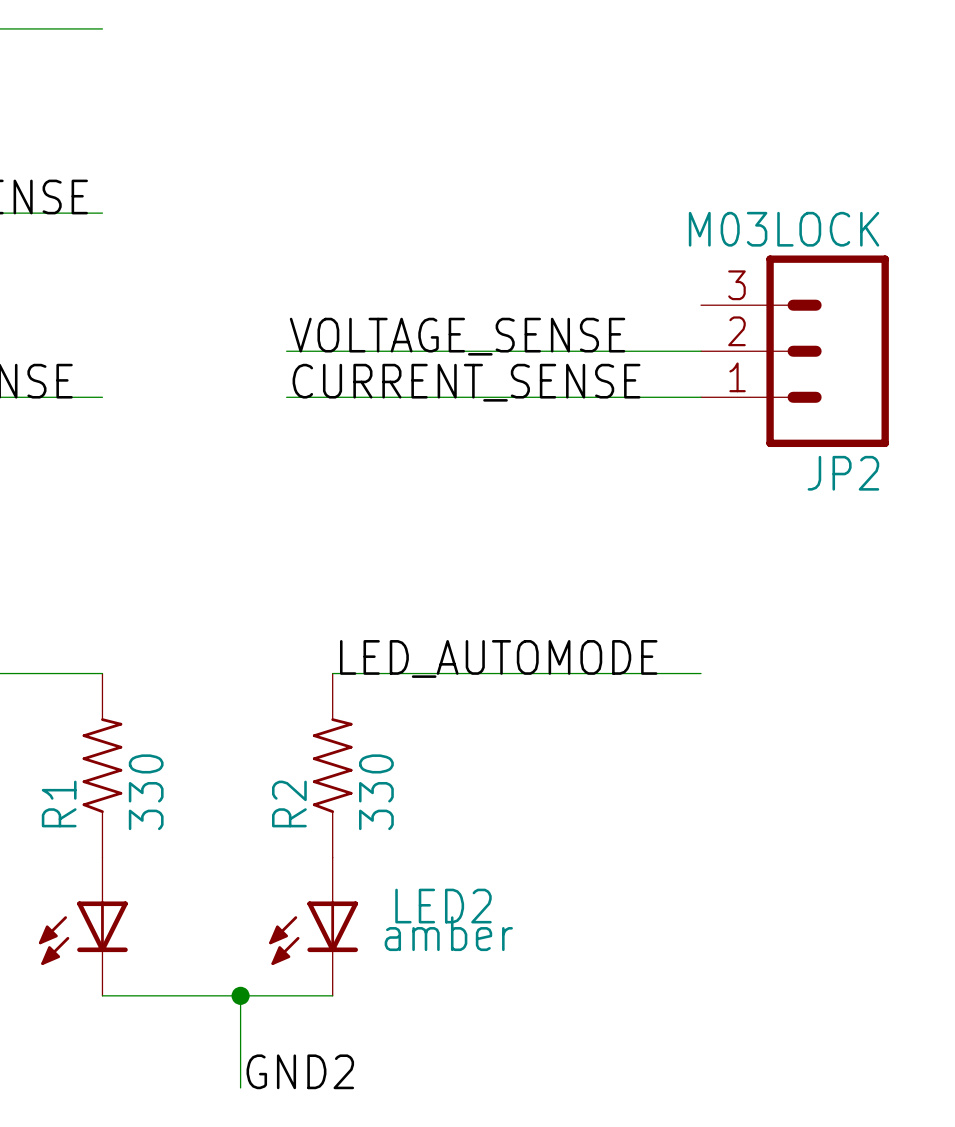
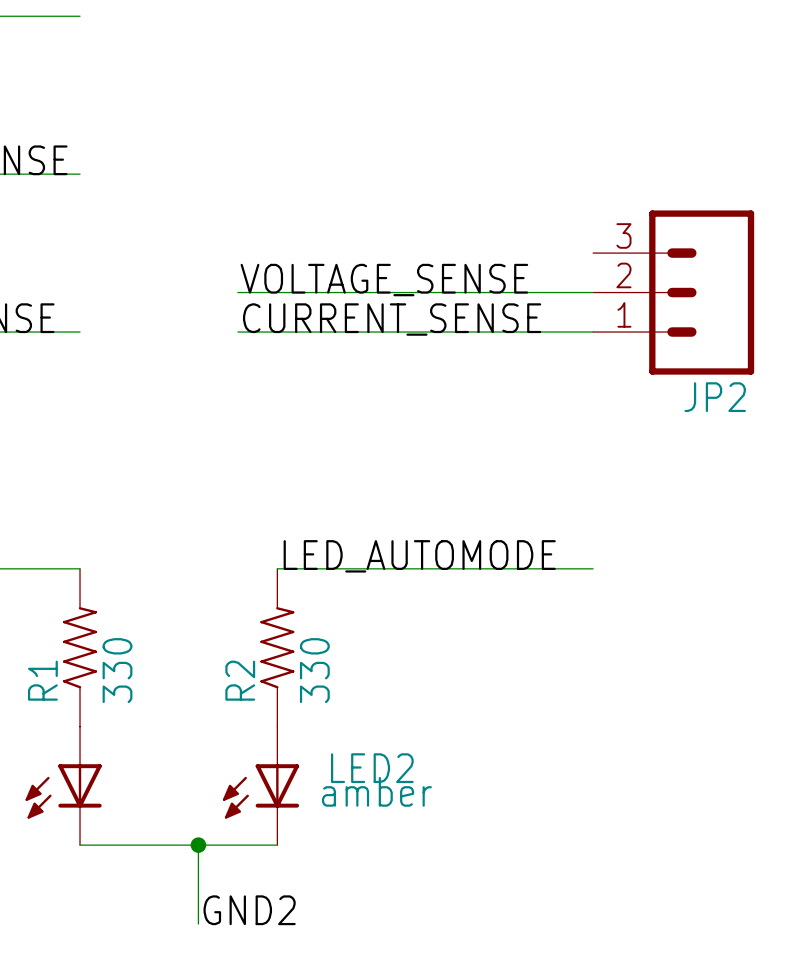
JP2 value: M03LOCK (784, 229) -> none

